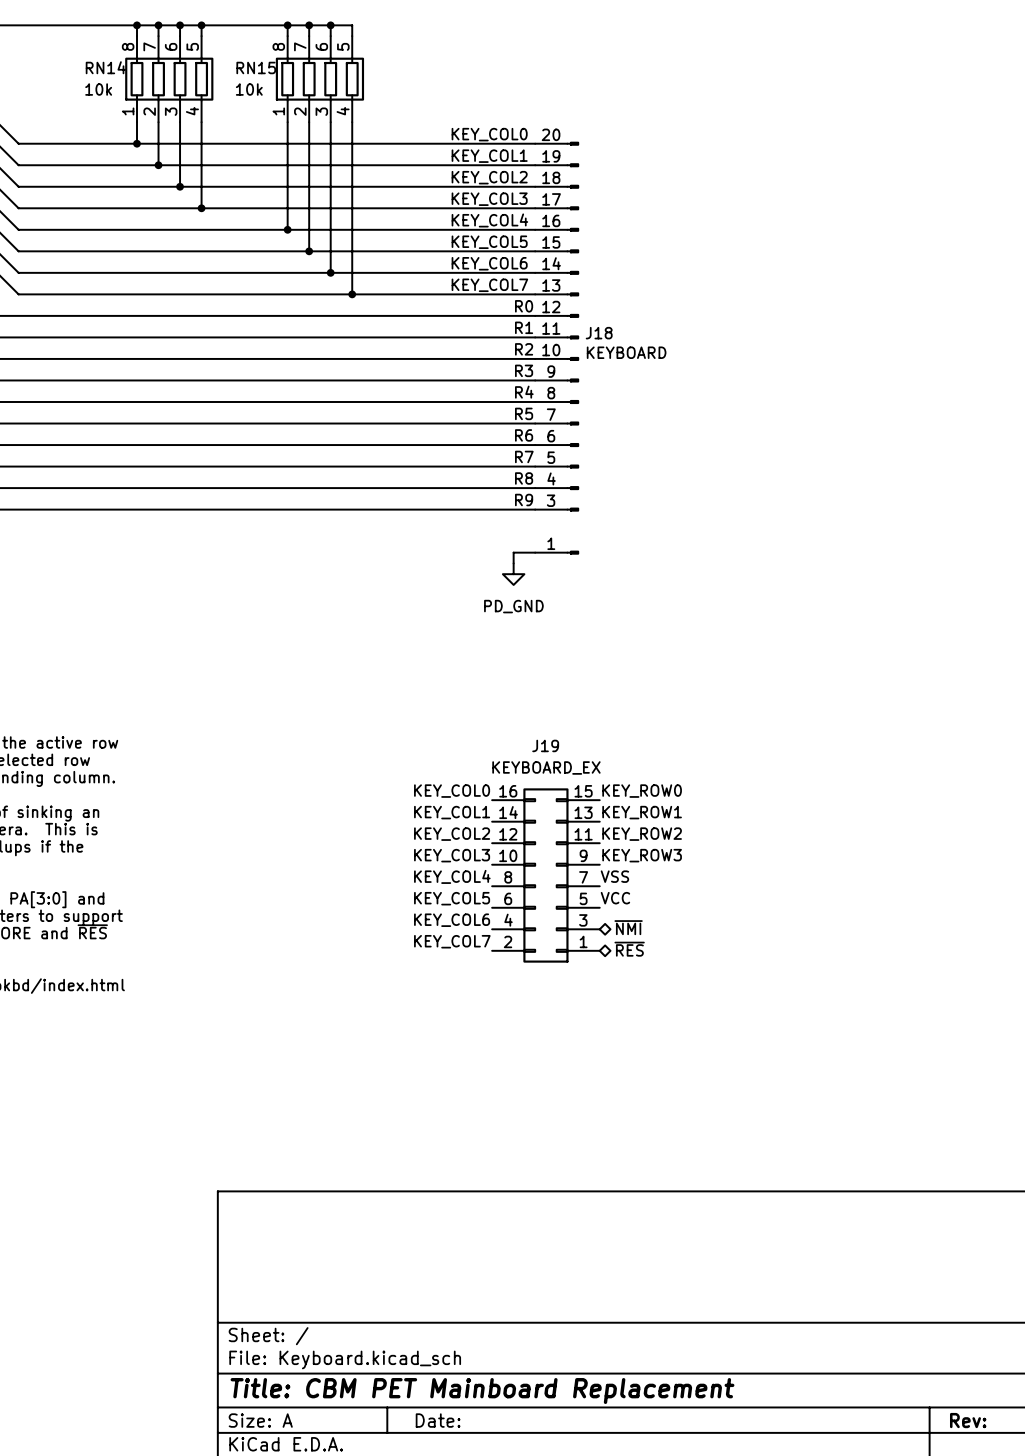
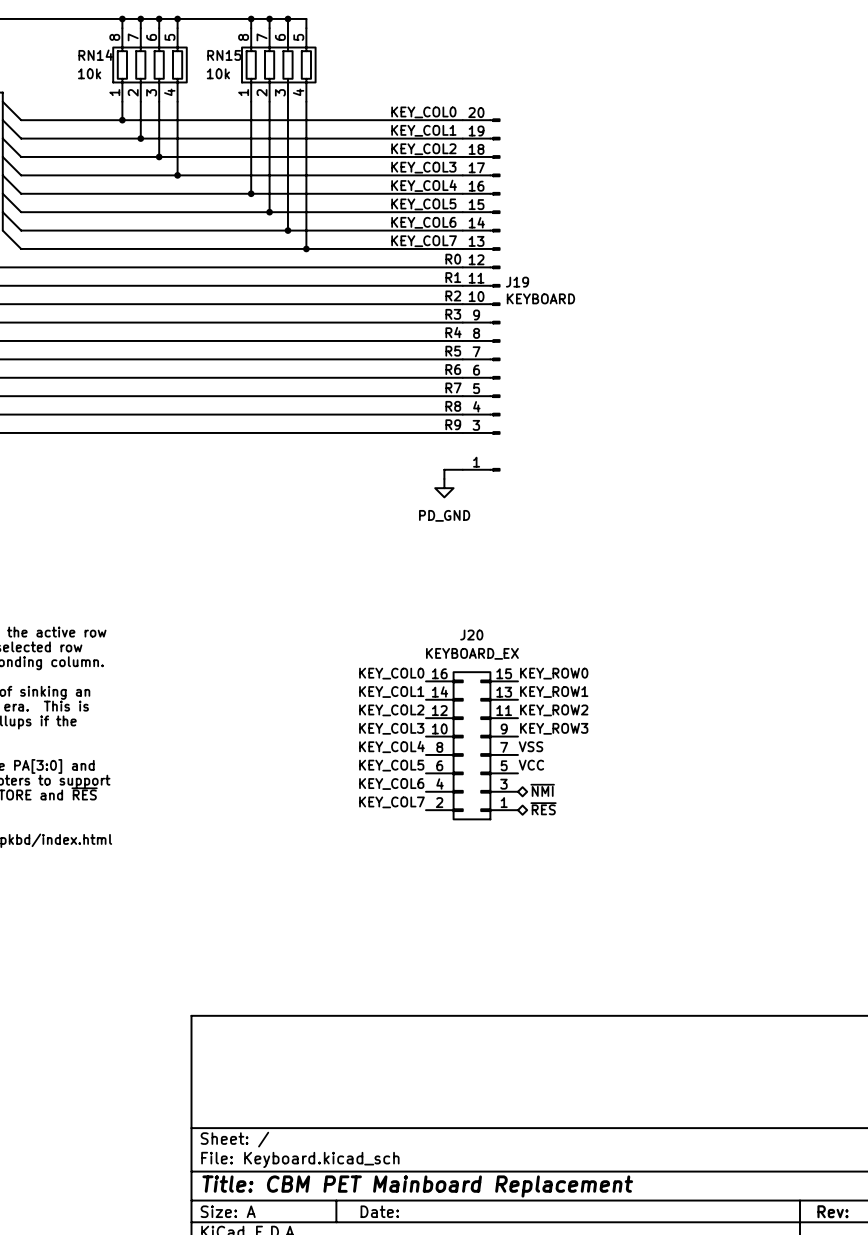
J18 name: J18 (599, 333) -> J19 (517, 282)
J19 name: J19 (545, 745) -> J20 (471, 635)

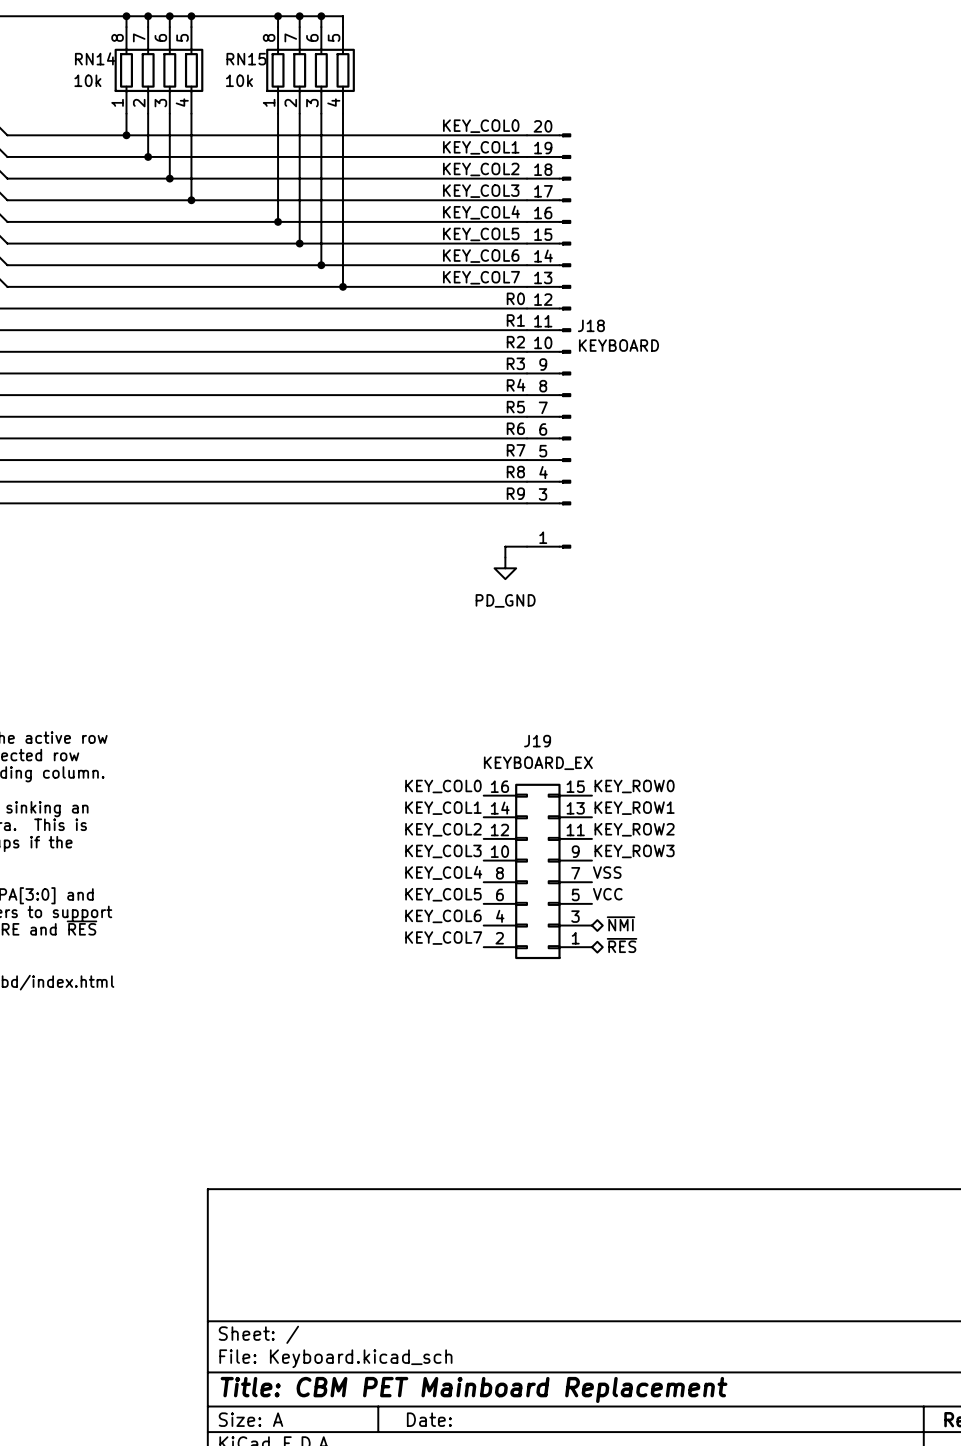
J19 name: J19 (517, 282) -> J18 (591, 325)
J20 name: J20 (471, 635) -> J19 (537, 741)

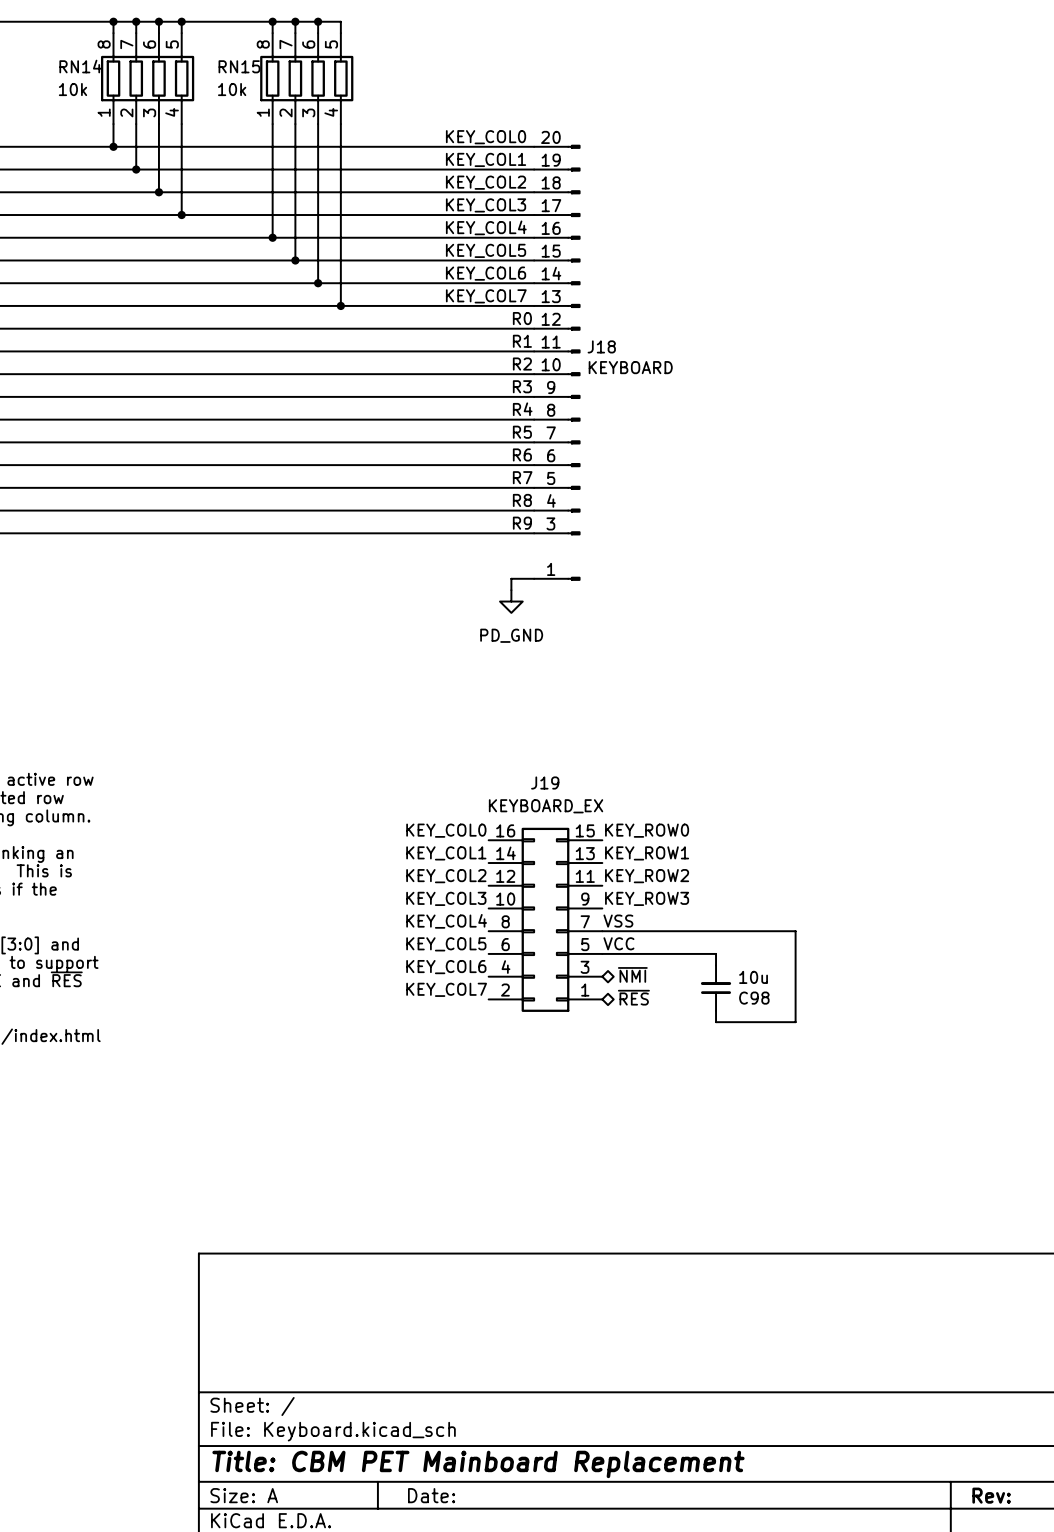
wire: none -> (602, 931) (795, 931) (795, 1022) (716, 1022) (716, 1010)
wire: none -> (602, 953) (716, 953) (716, 965)
C98: none -> 10u (716, 988)

